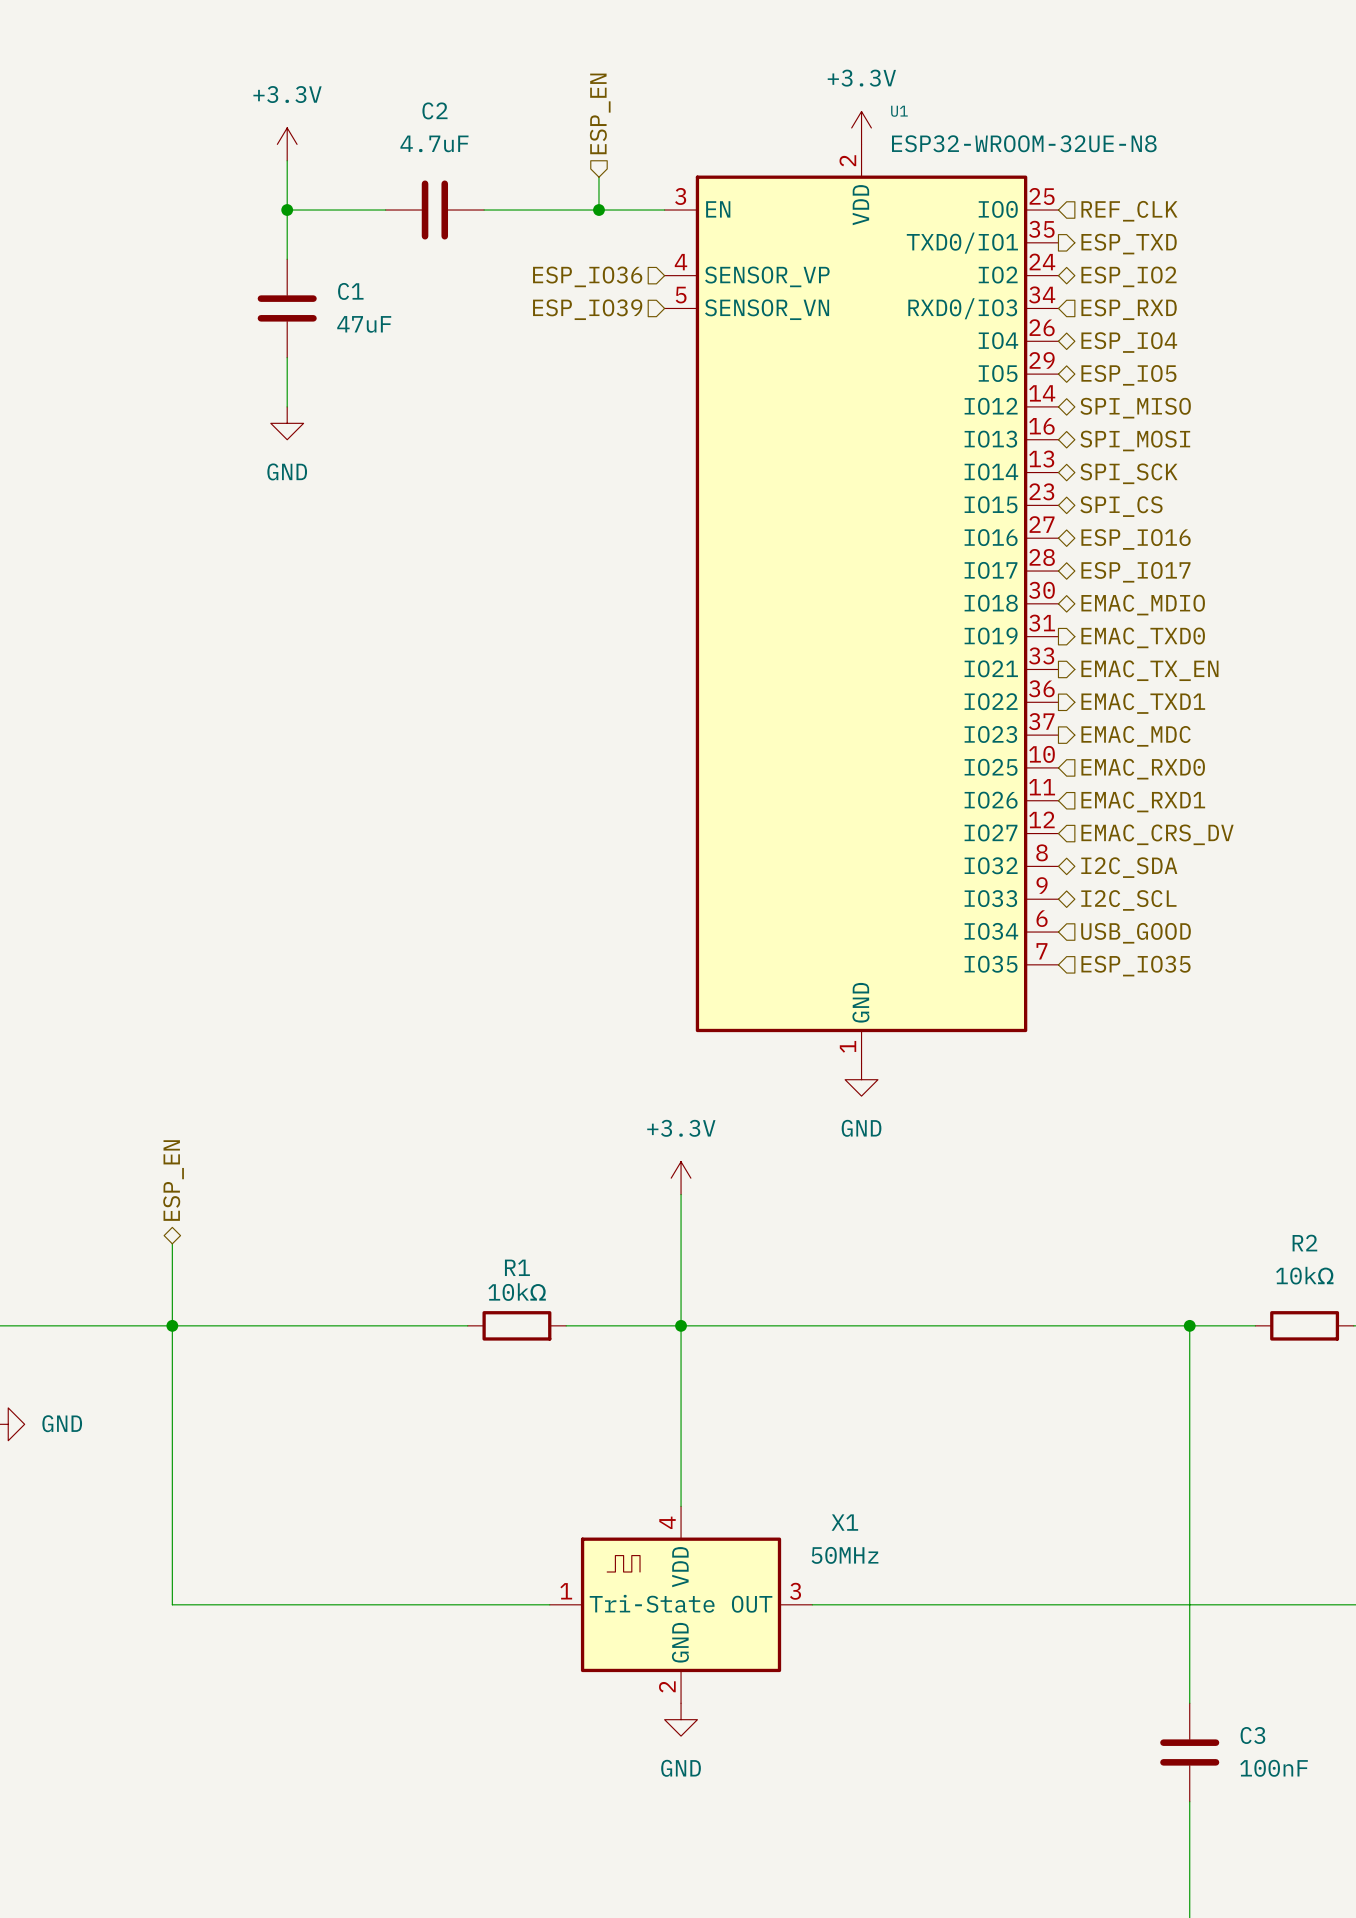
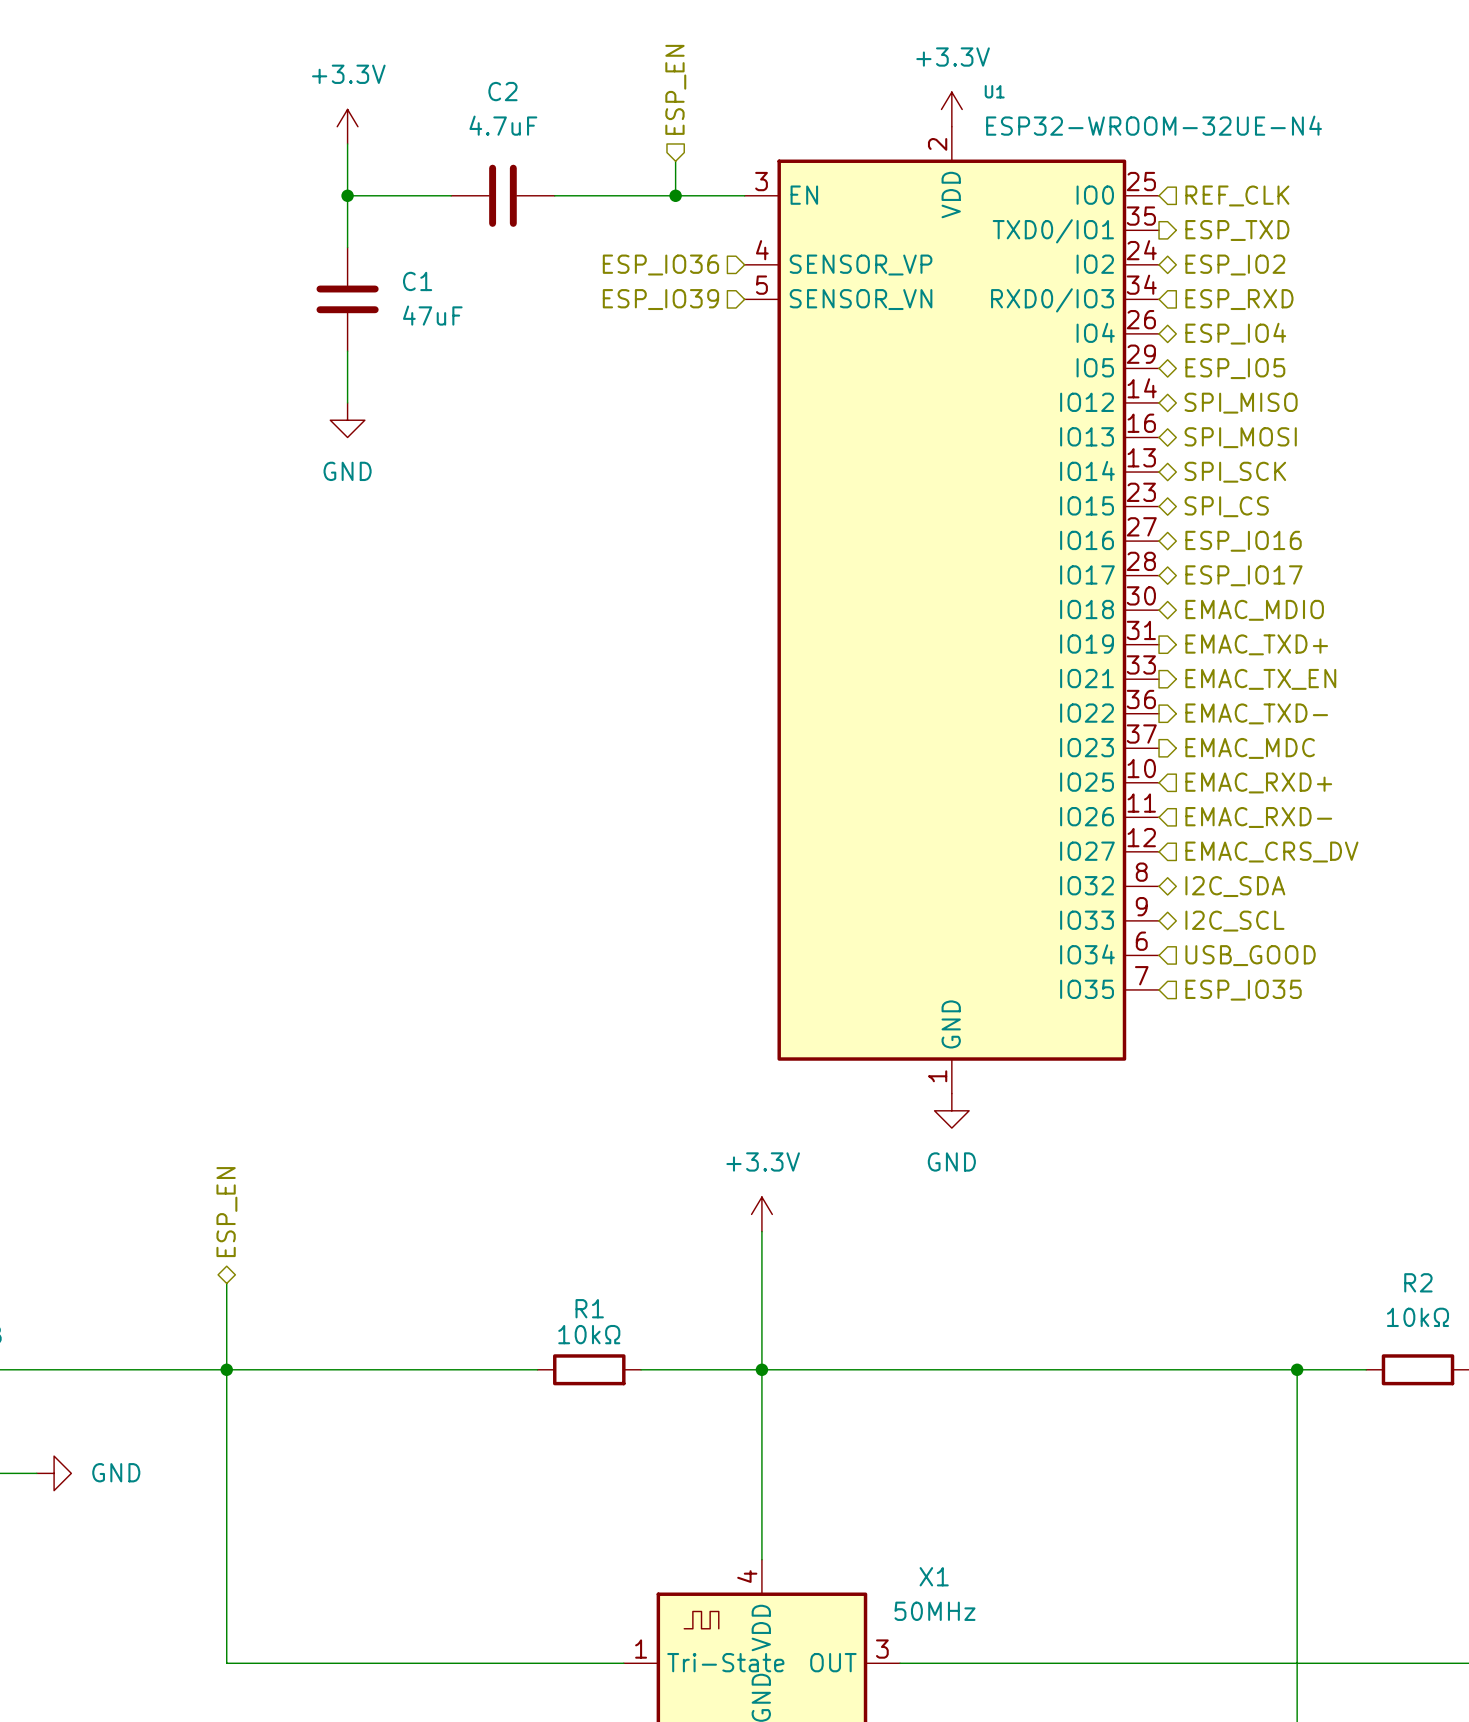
U1 value: ESP32-WROOM-32UE-N8 (1024, 143) -> ESP32-WROOM-32UE-N4 (1154, 125)
hierarchical label: EMAC_TXD0 (1143, 637) -> EMAC_TXD+ (1256, 644)
hierarchical label: EMAC_TXD1 (1143, 703) -> EMAC_TXD- (1256, 713)
hierarchical label: EMAC_RXD0 (1143, 769) -> EMAC_RXD+ (1258, 782)
hierarchical label: EMAC_RXD1 (1143, 801) -> EMAC_RXD- (1258, 817)

